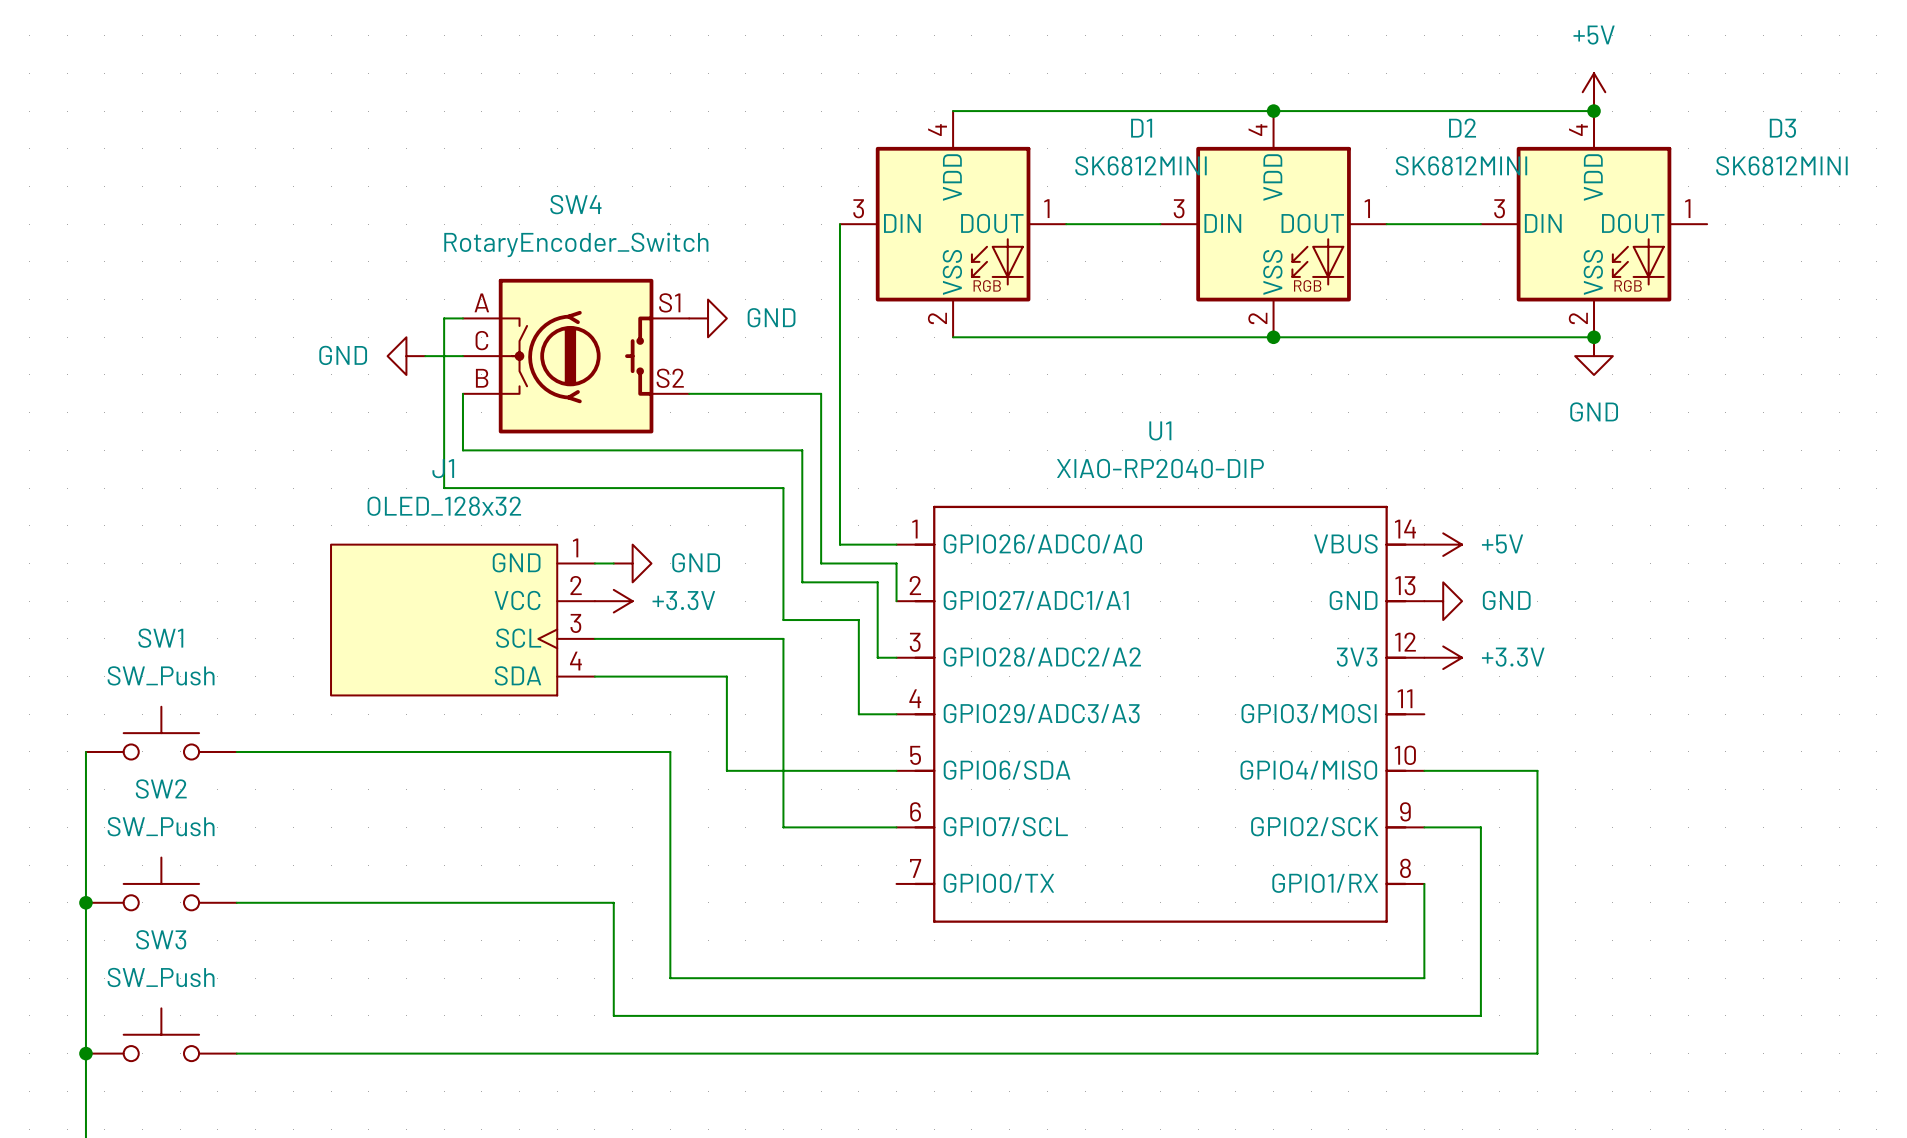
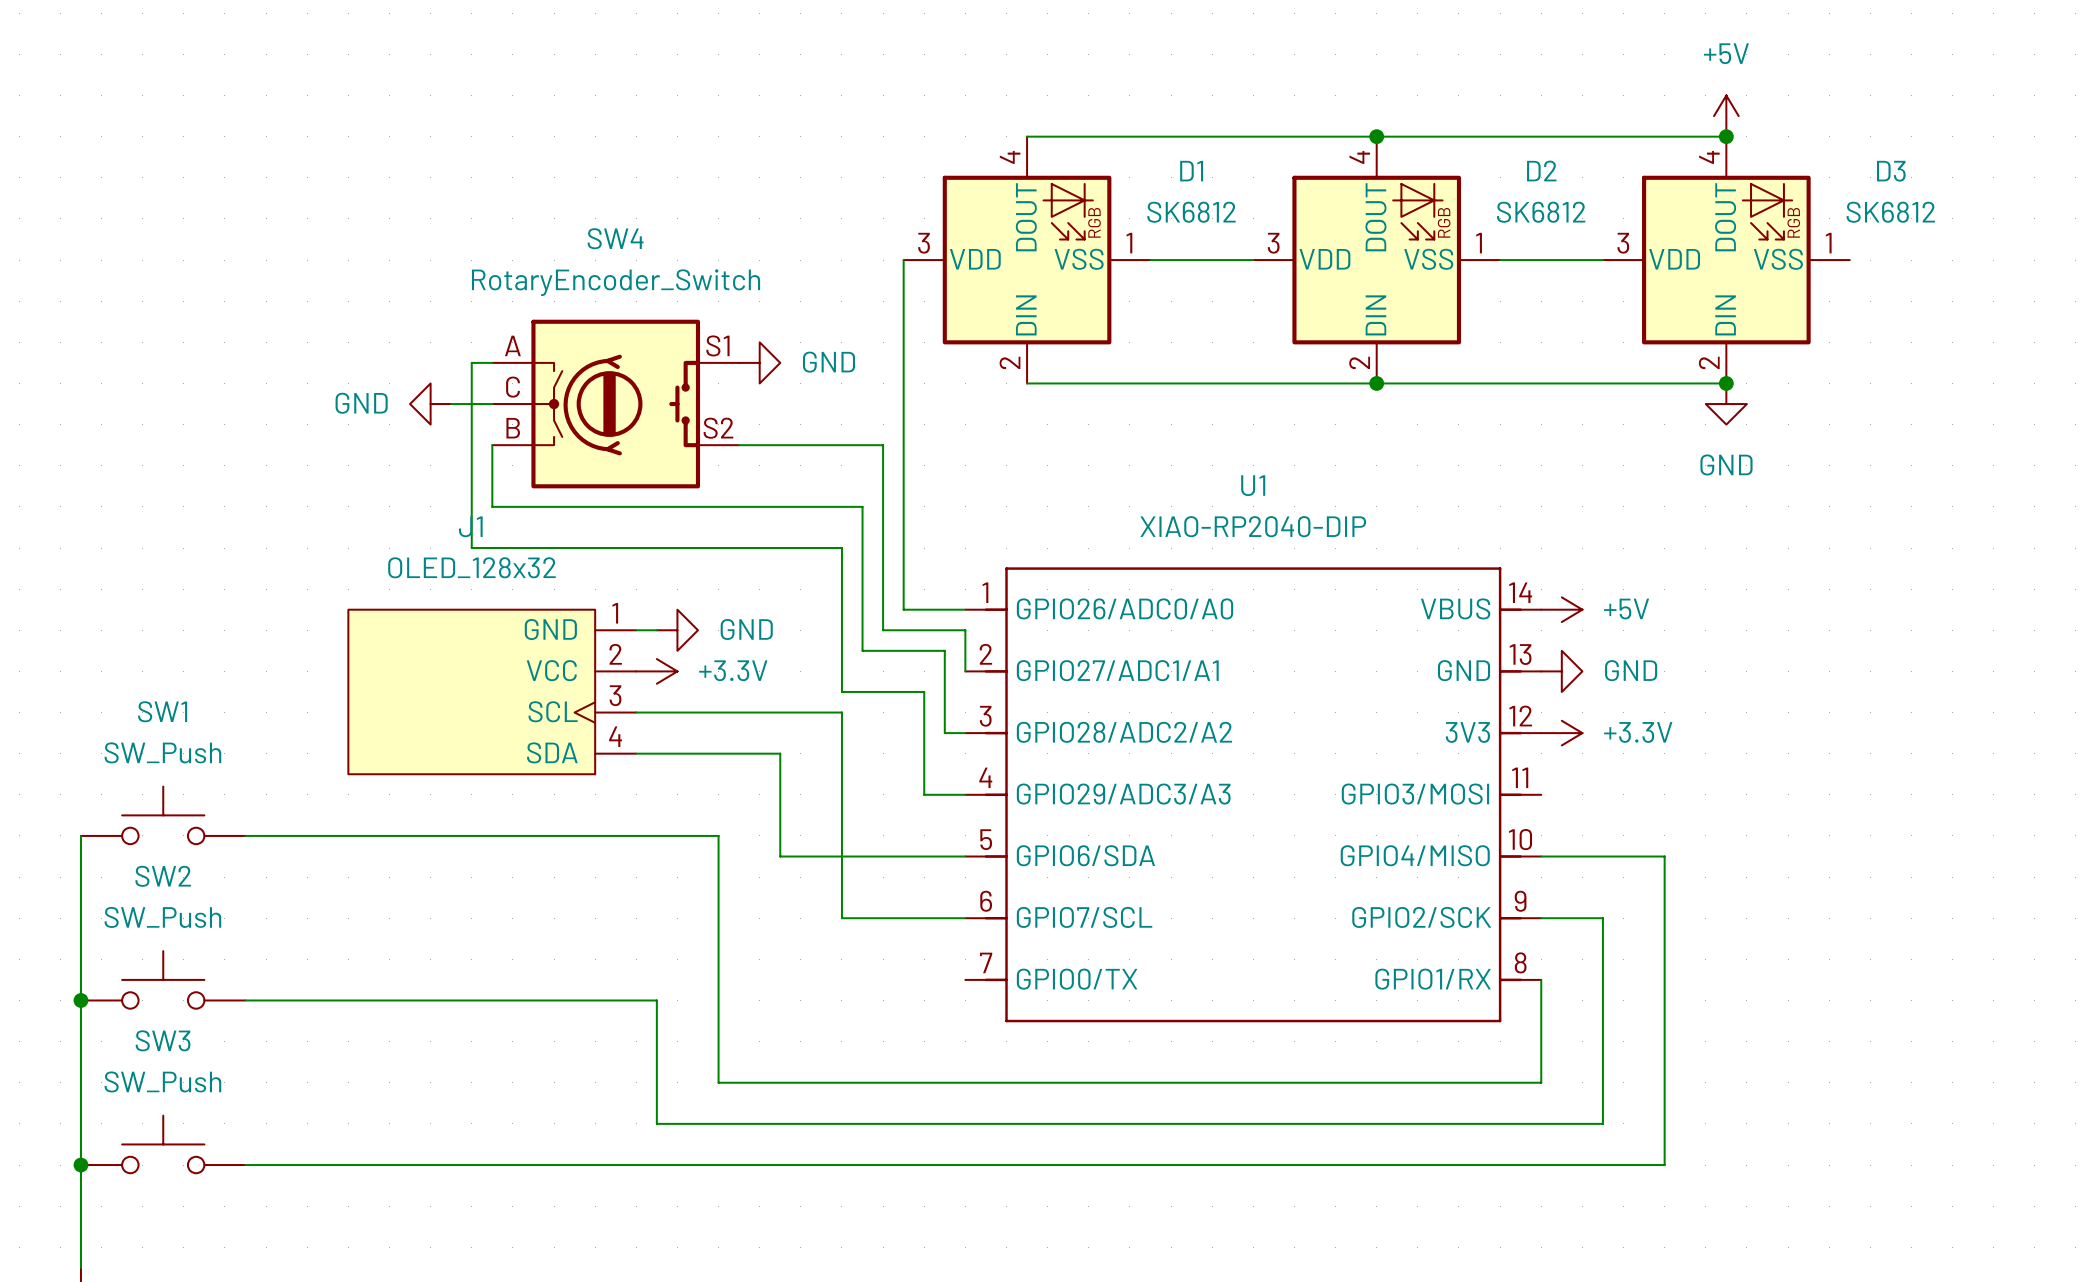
D1 symbol: [839, 111, 1067, 338] -> [903, 136, 1151, 384]
D2 symbol: [1160, 111, 1387, 338] -> [1253, 136, 1501, 384]
D3 symbol: [1480, 111, 1708, 338] -> [1602, 136, 1850, 384]
D1 name position: D1 (1141, 128) -> D1 (1191, 171)
D2 name position: D2 (1462, 128) -> D2 (1541, 170)
D3 name position: D3 (1782, 128) -> D3 (1891, 171)
D1 value: SK6812MINI (1141, 165) -> SK6812 (1191, 212)
D2 value: SK6812MINI (1461, 165) -> SK6812 (1541, 212)
D3 value: SK6812MINI (1781, 165) -> SK6812 (1890, 212)

